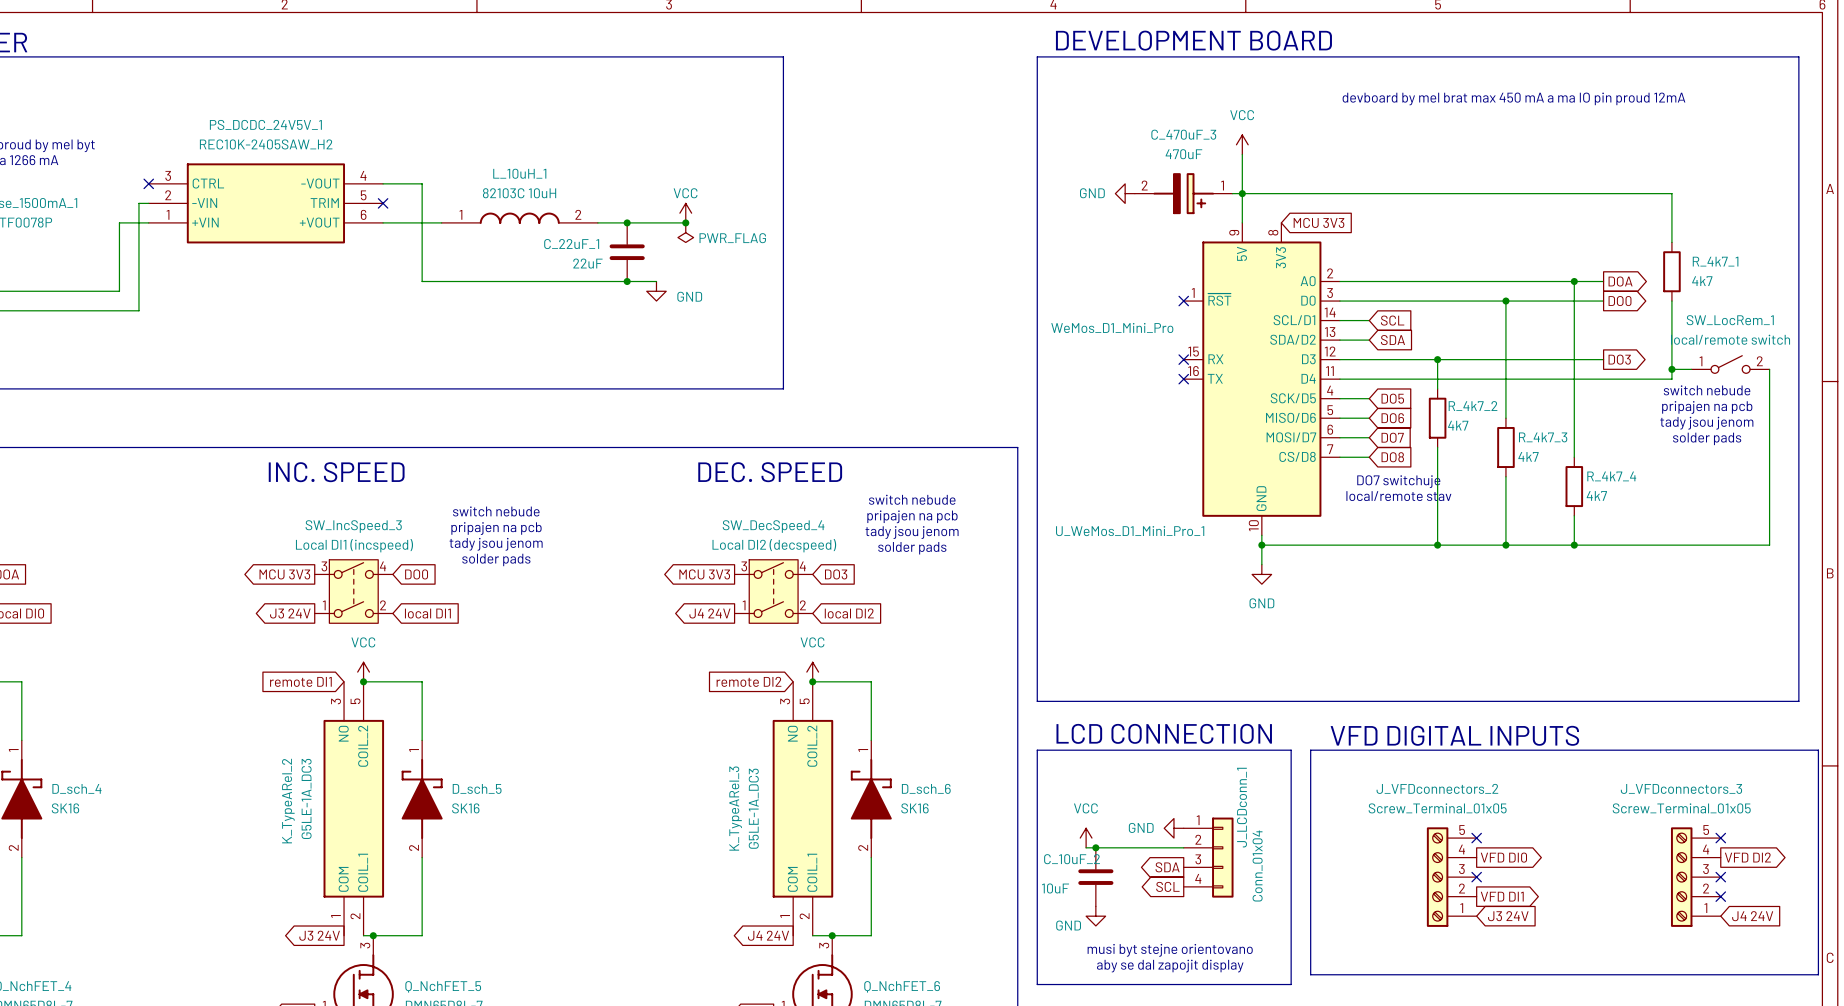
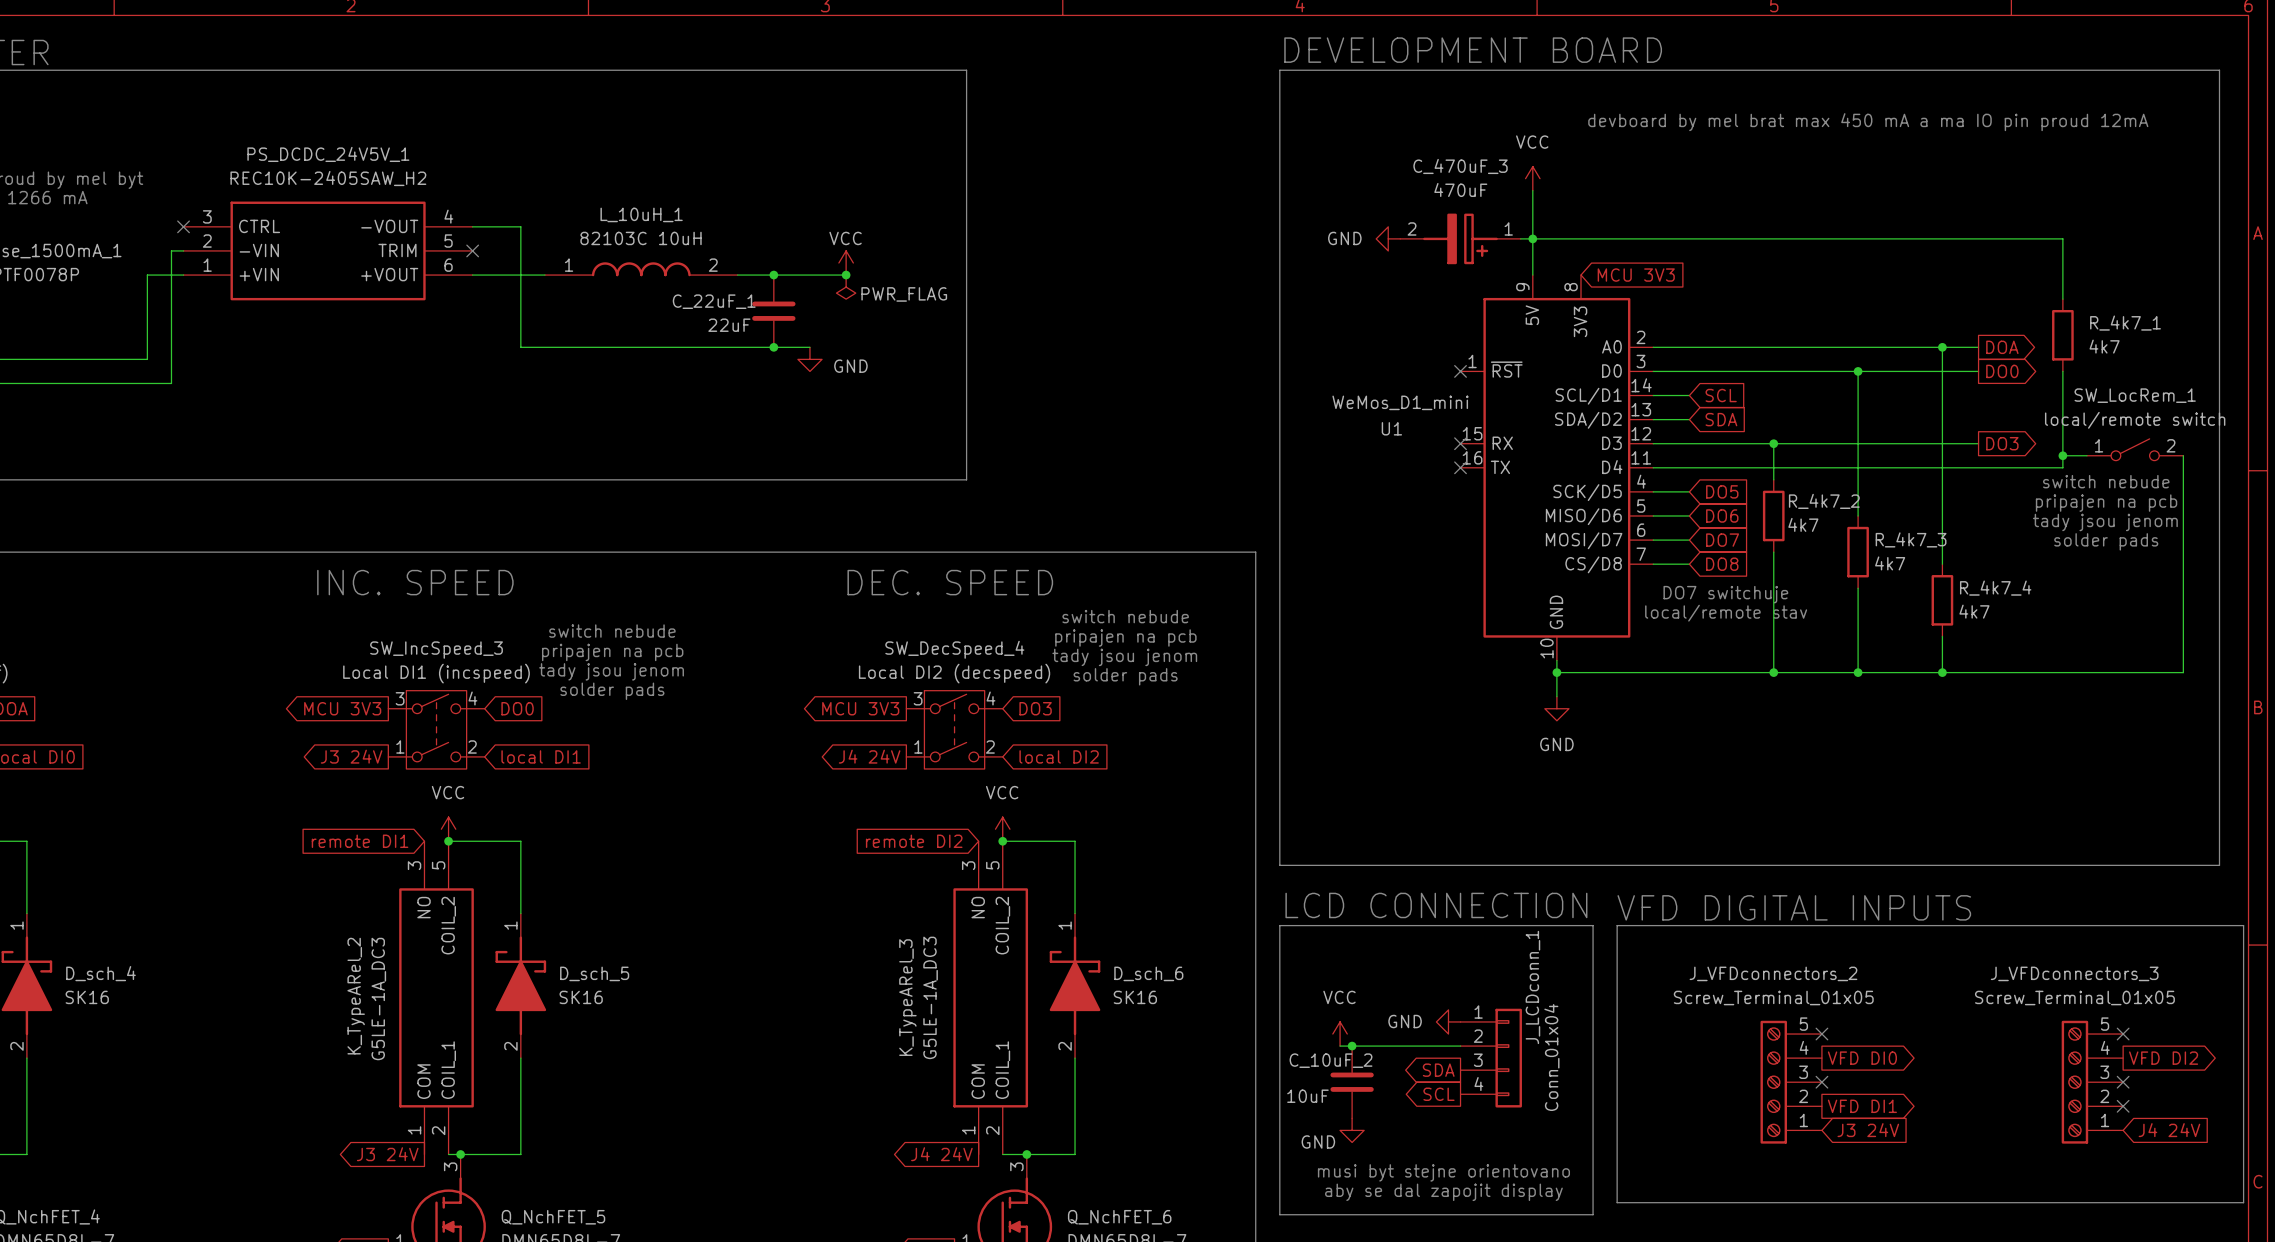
U_WeMos_D1_Mini_Pro_1 value: WeMos_D1_Mini_Pro (1112, 328) -> WeMos_D1_mini (1400, 402)
U_WeMos_D1_Mini_Pro_1 name: U_WeMos_D1_Mini_Pro_1 (1130, 531) -> U1 (1391, 428)

